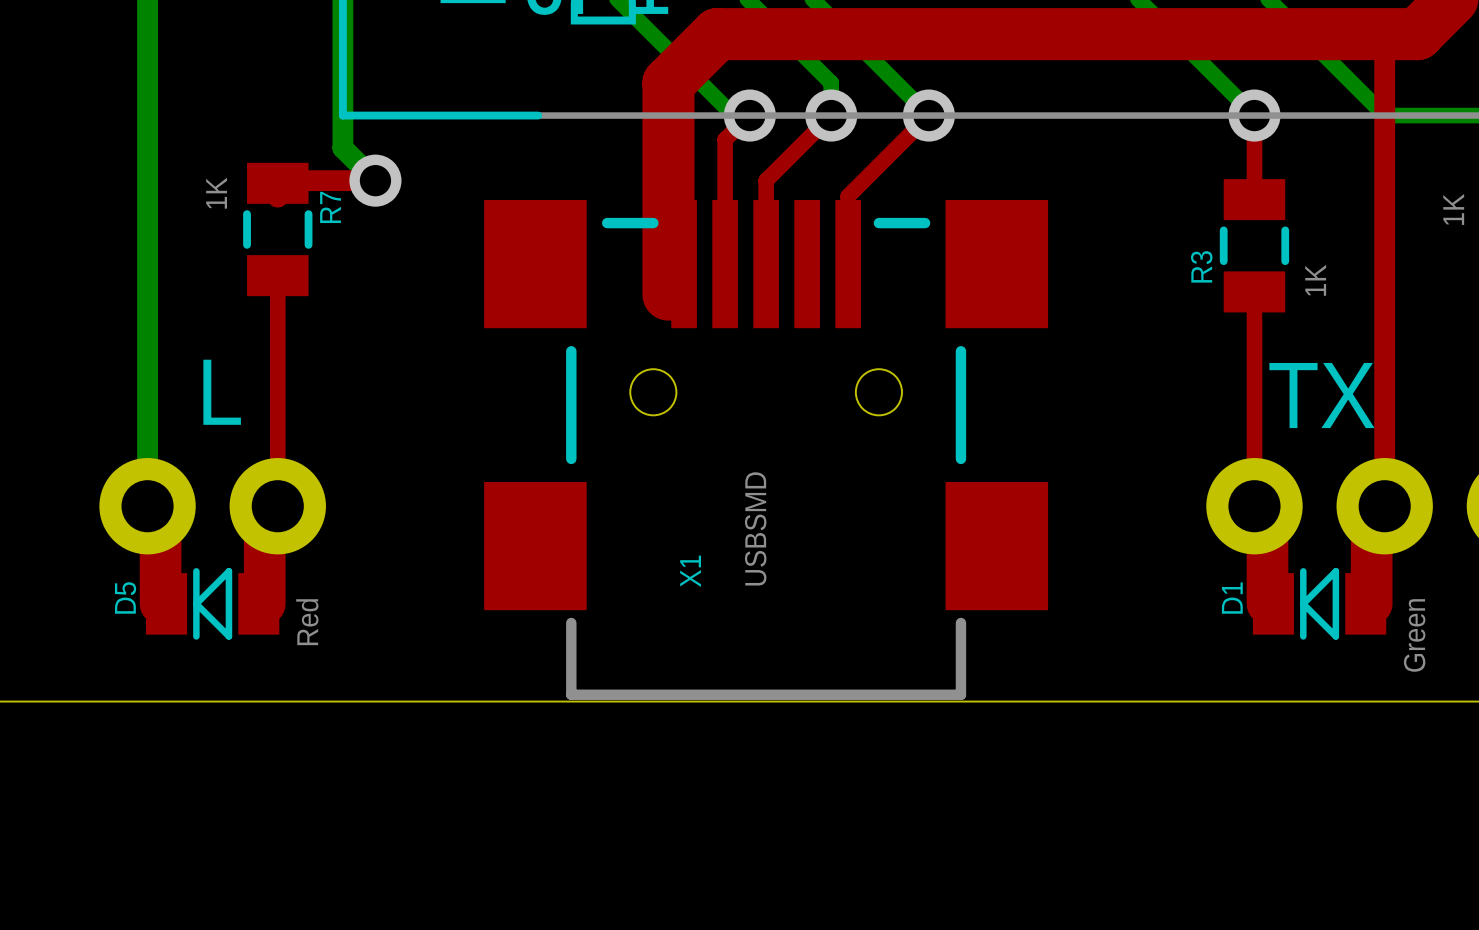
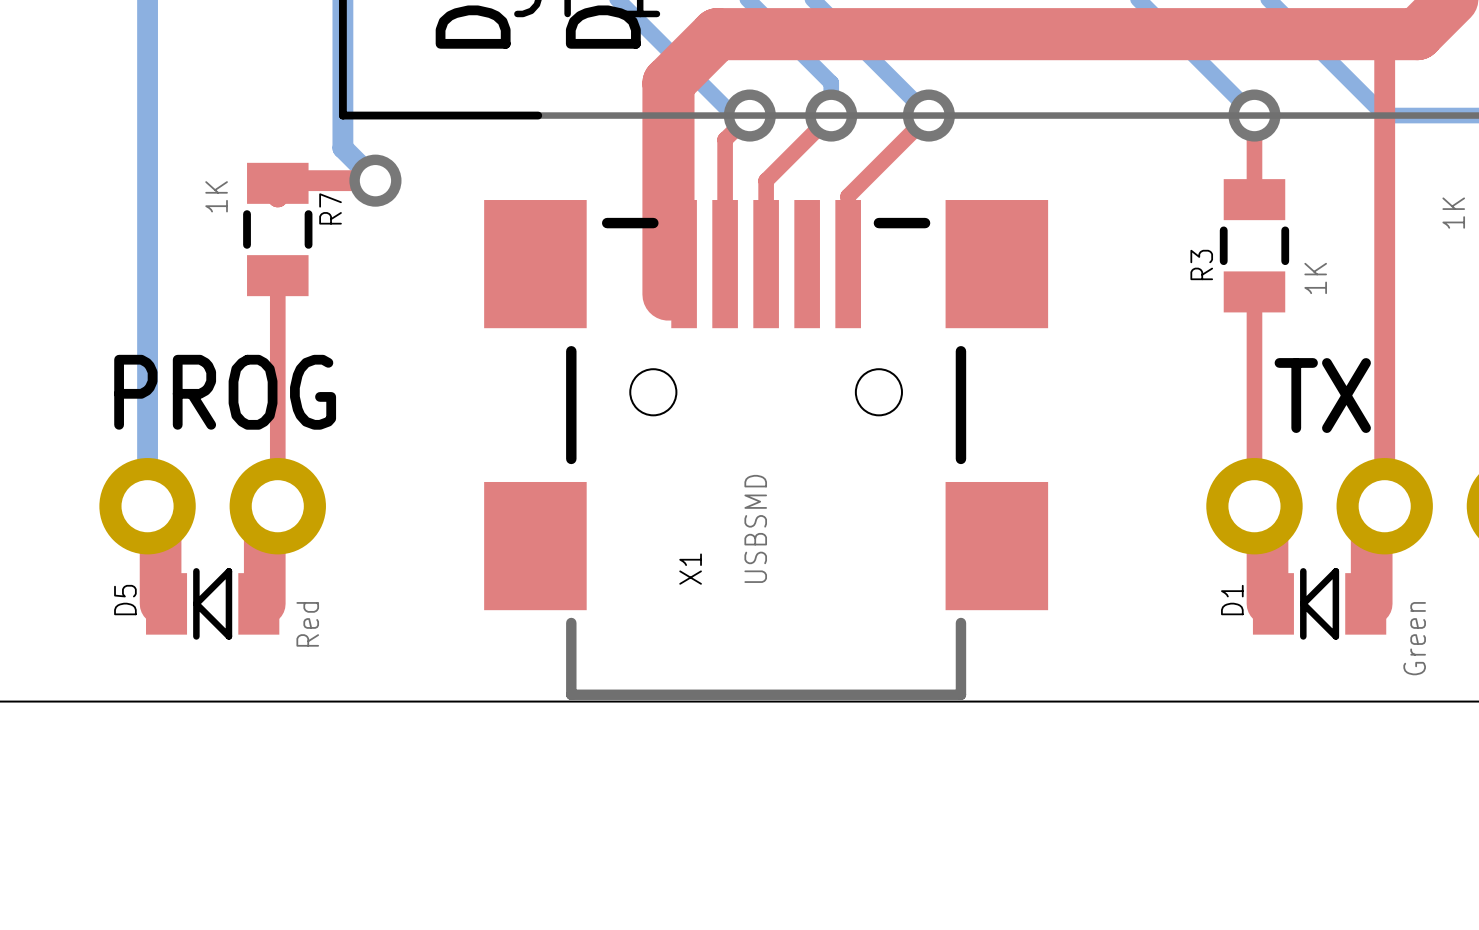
text: L (222, 392) -> none
text: none -> PROG (225, 392)

